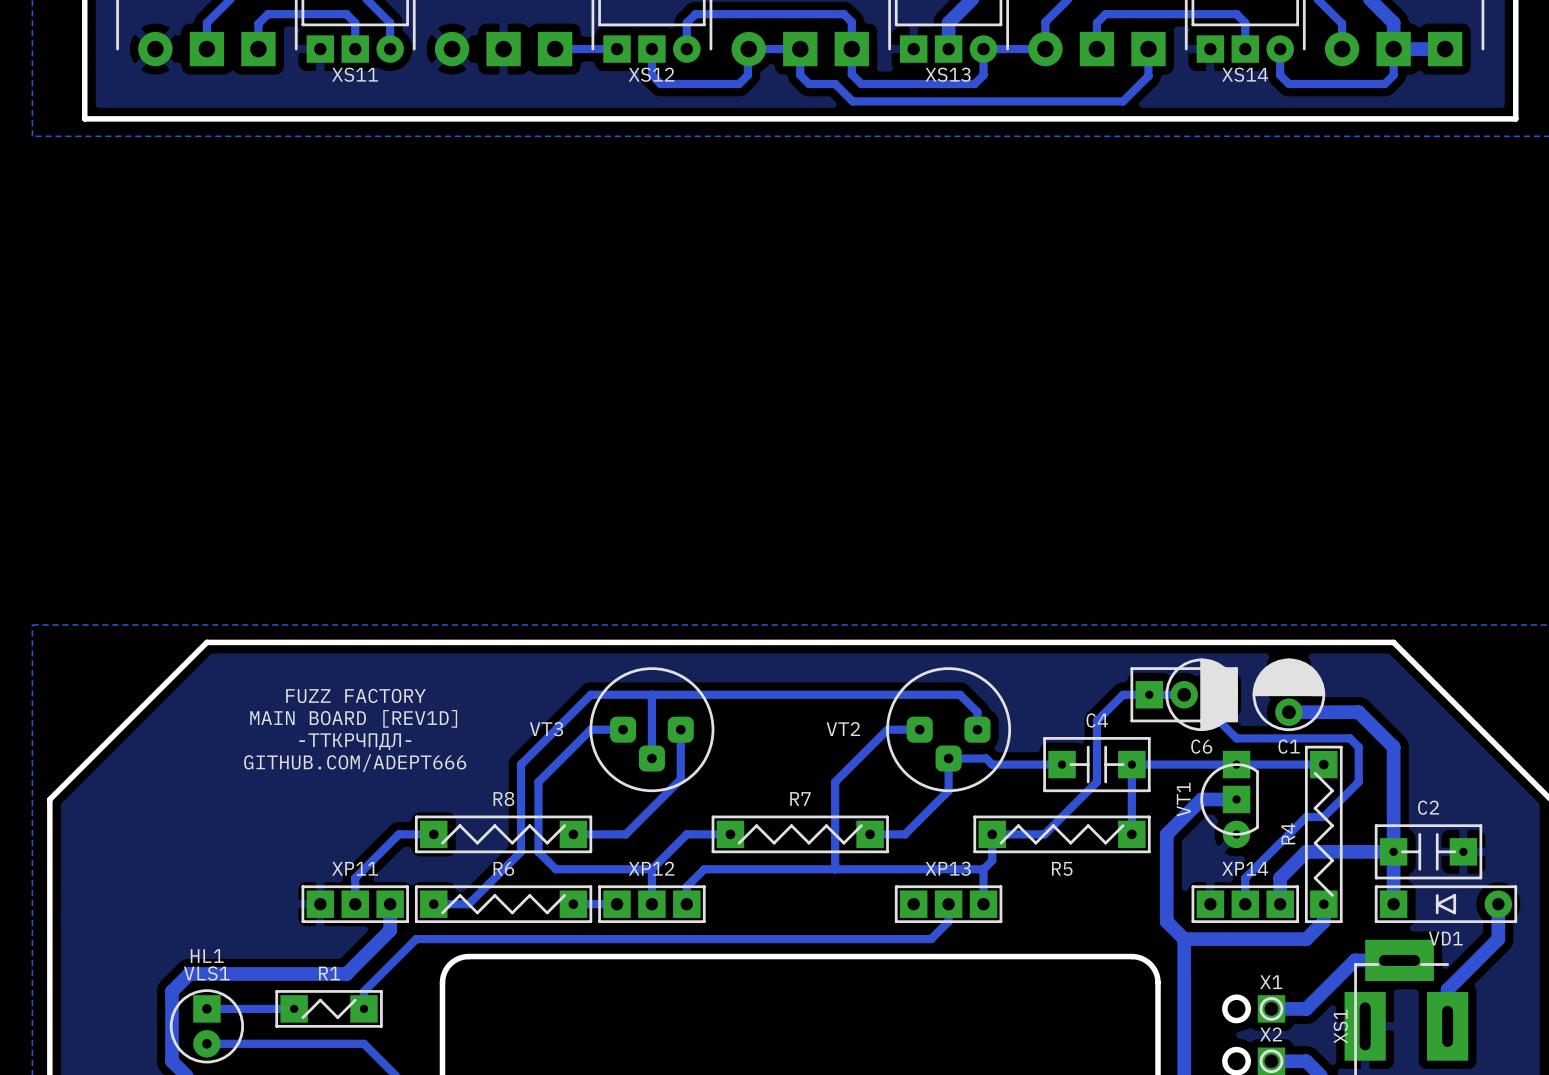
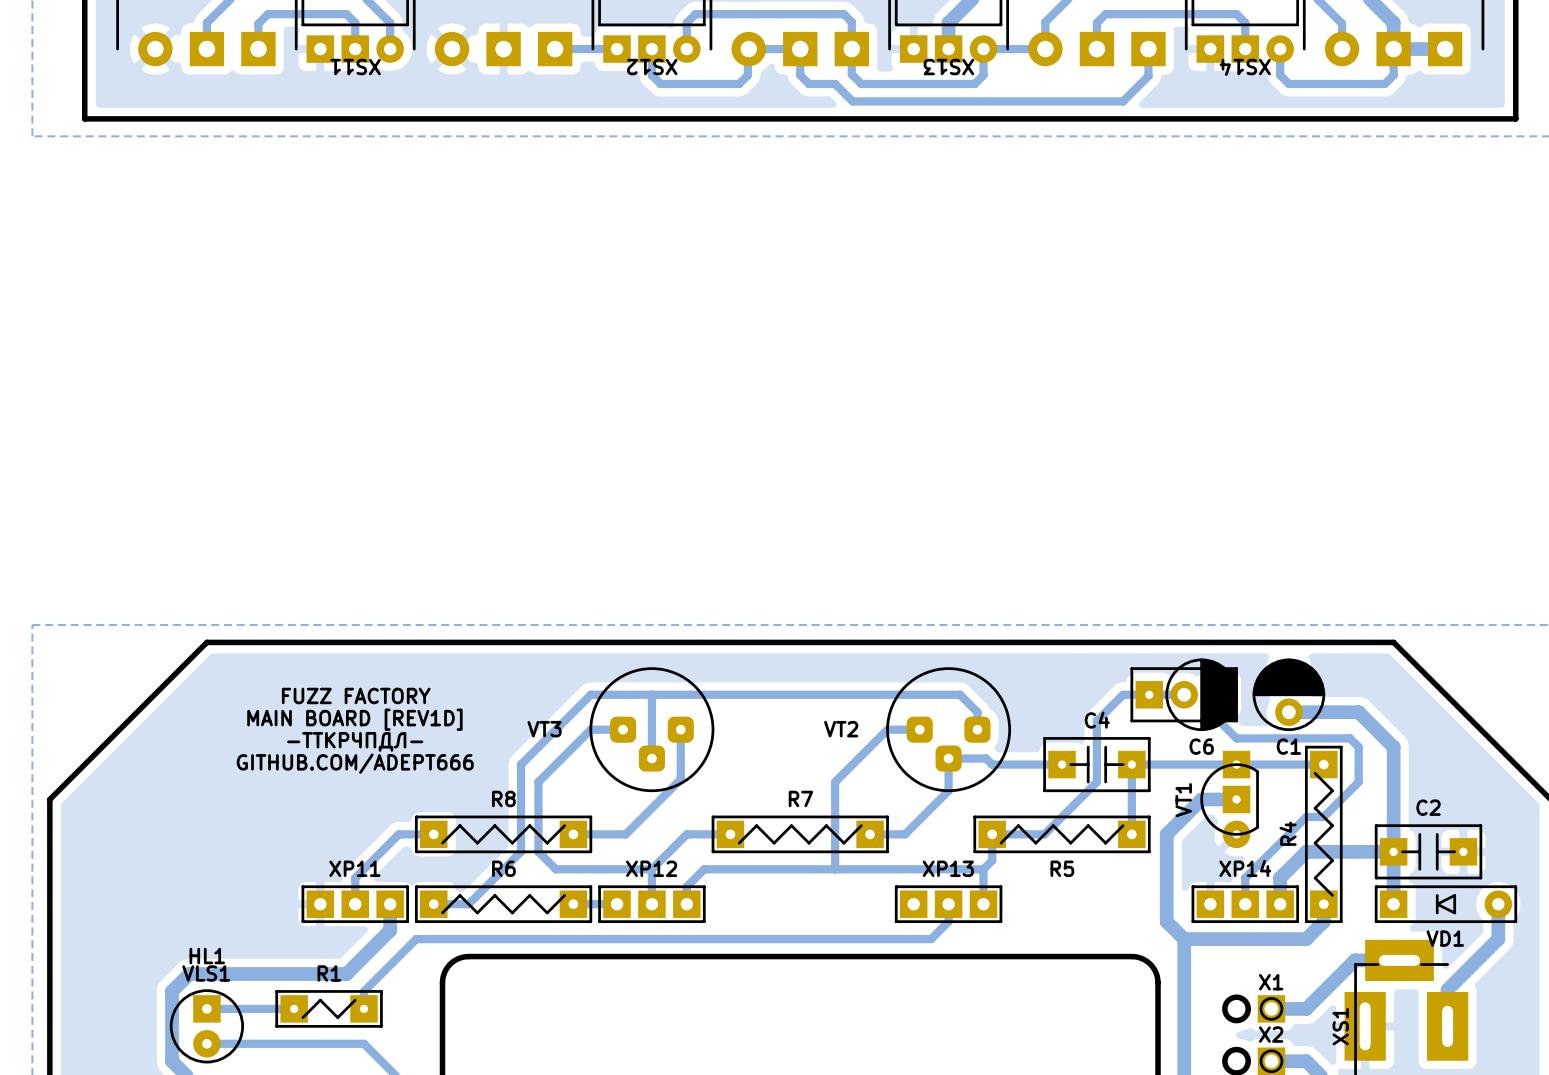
XS11 name rotation: 0° (355, 74) -> 180° (355, 67)
XS12 name rotation: 0° (651, 74) -> 180° (652, 67)
XS13 name rotation: 0° (948, 74) -> 180° (948, 67)
XS14 name rotation: 0° (1245, 74) -> 180° (1245, 67)

